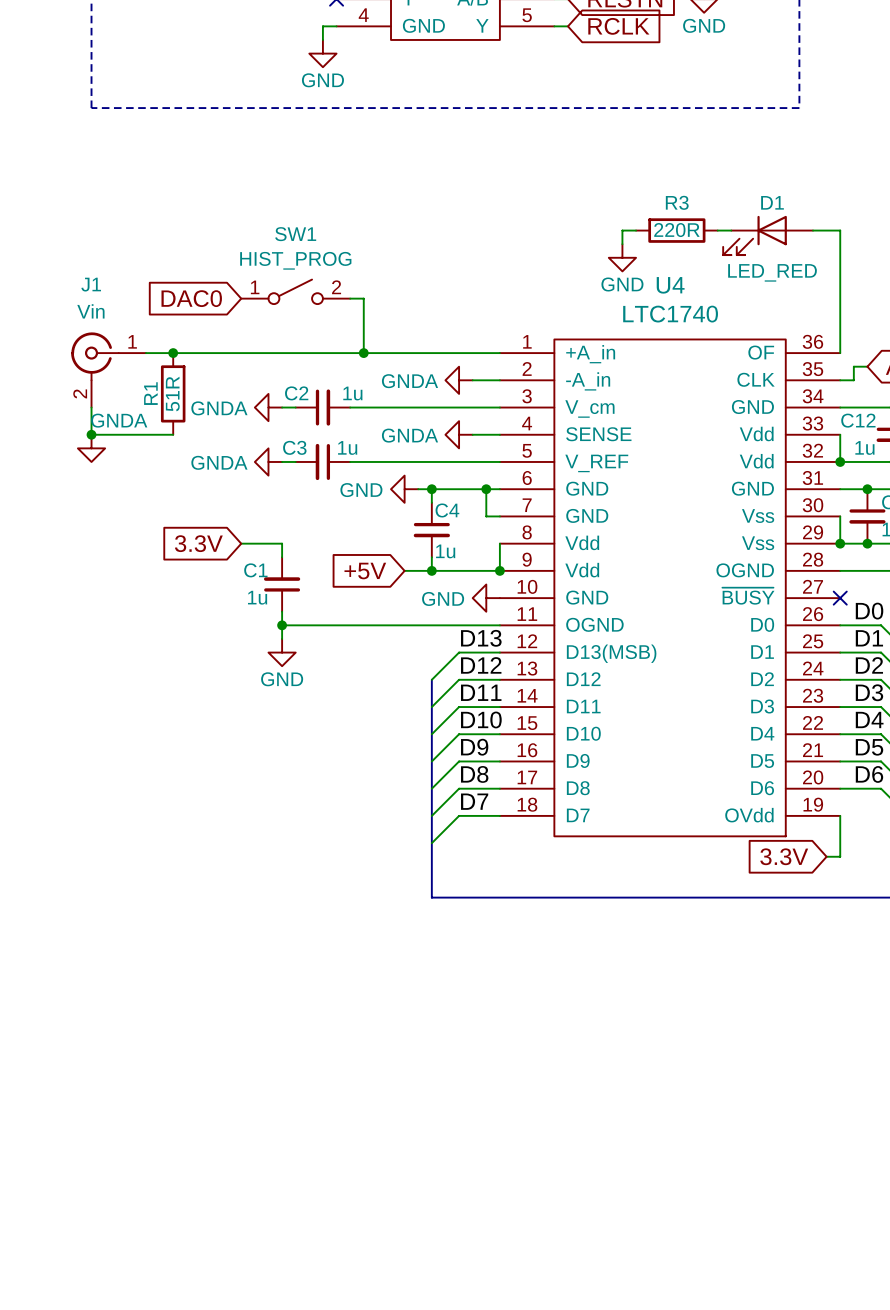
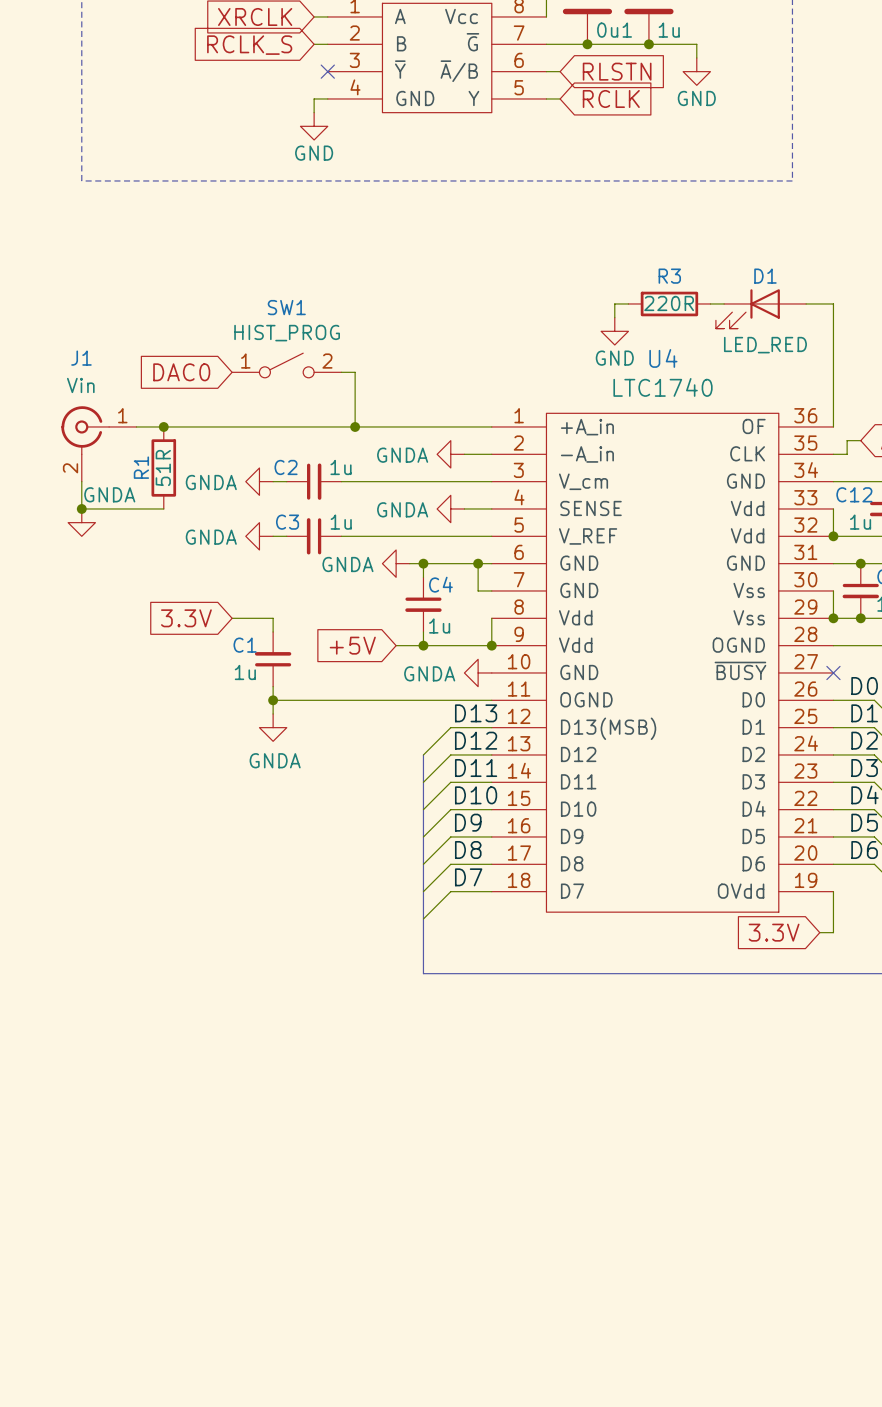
power symbol: GND (404, 489) -> GNDA (396, 563)
power symbol: GND (486, 598) -> GNDA (478, 672)
power symbol: GND (282, 652) -> GNDA (273, 727)

